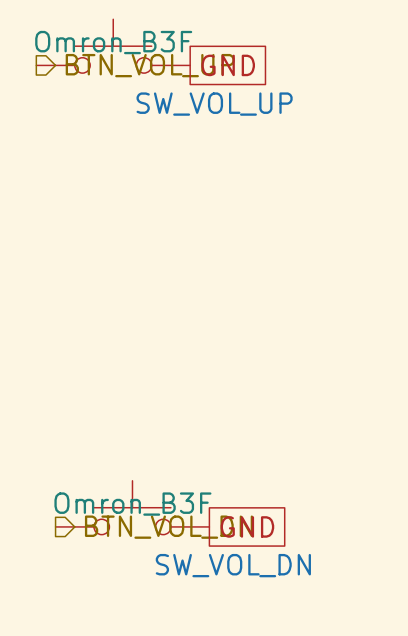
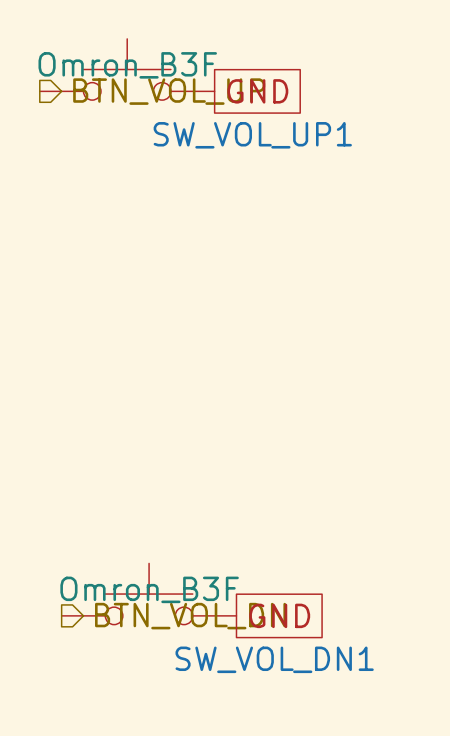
SW_VOL_UP name: SW_VOL_UP (214, 104) -> SW_VOL_UP1 (252, 135)
SW_VOL_DN name: SW_VOL_DN (233, 565) -> SW_VOL_DN1 (274, 659)

